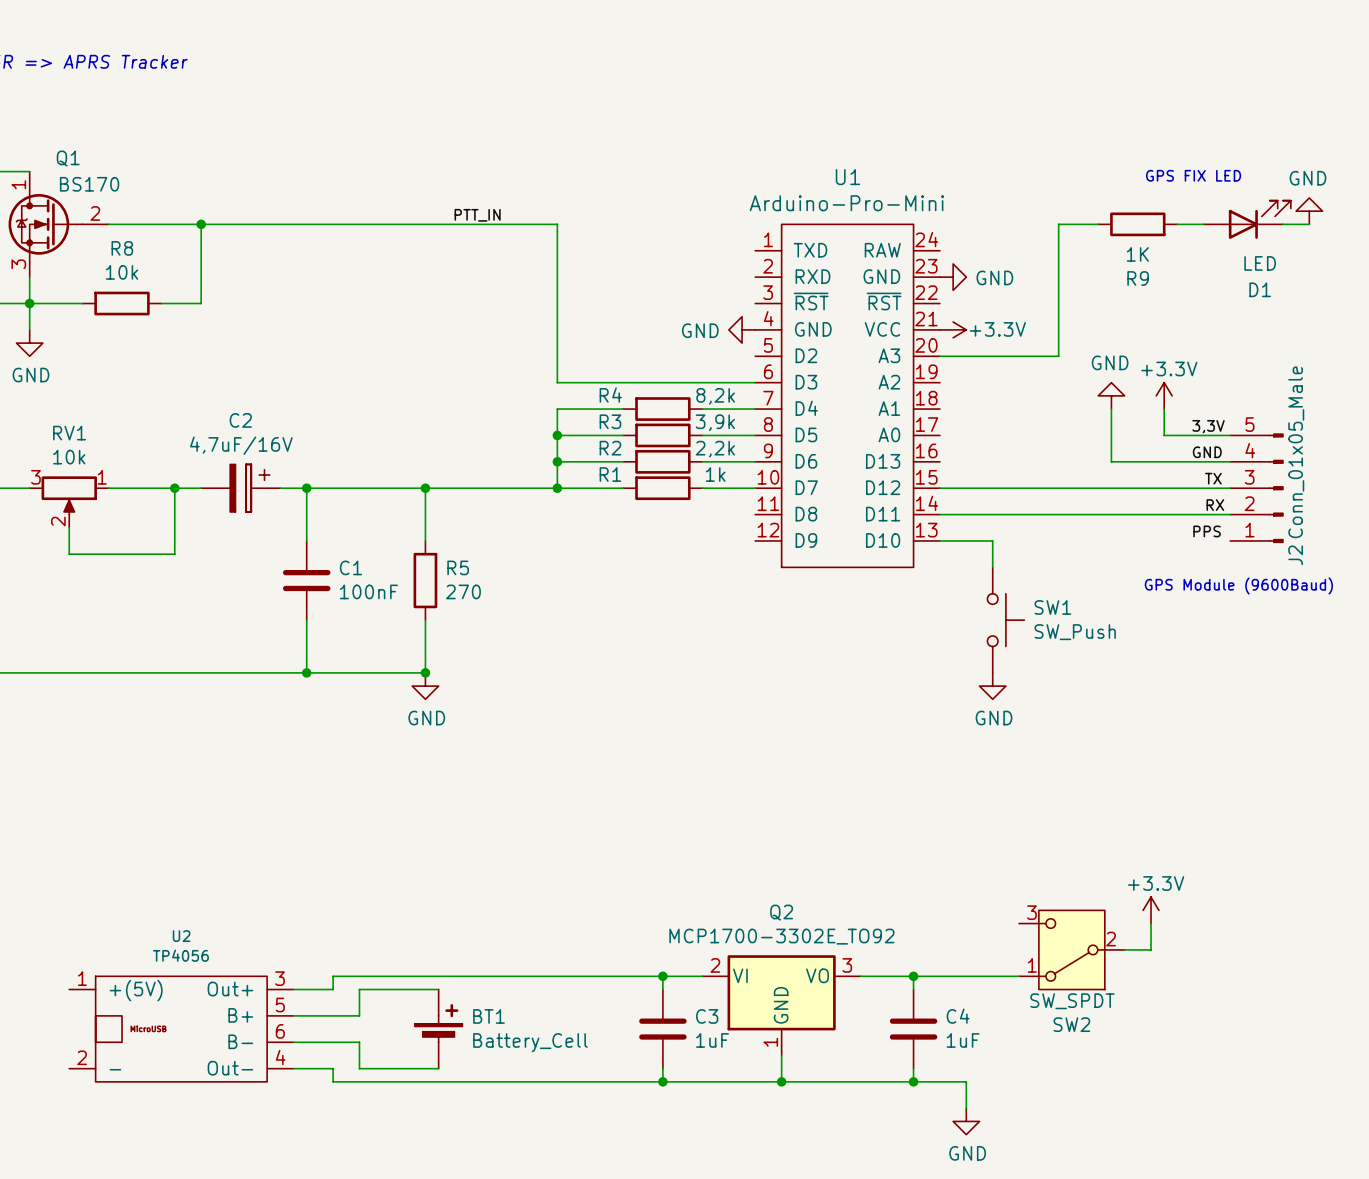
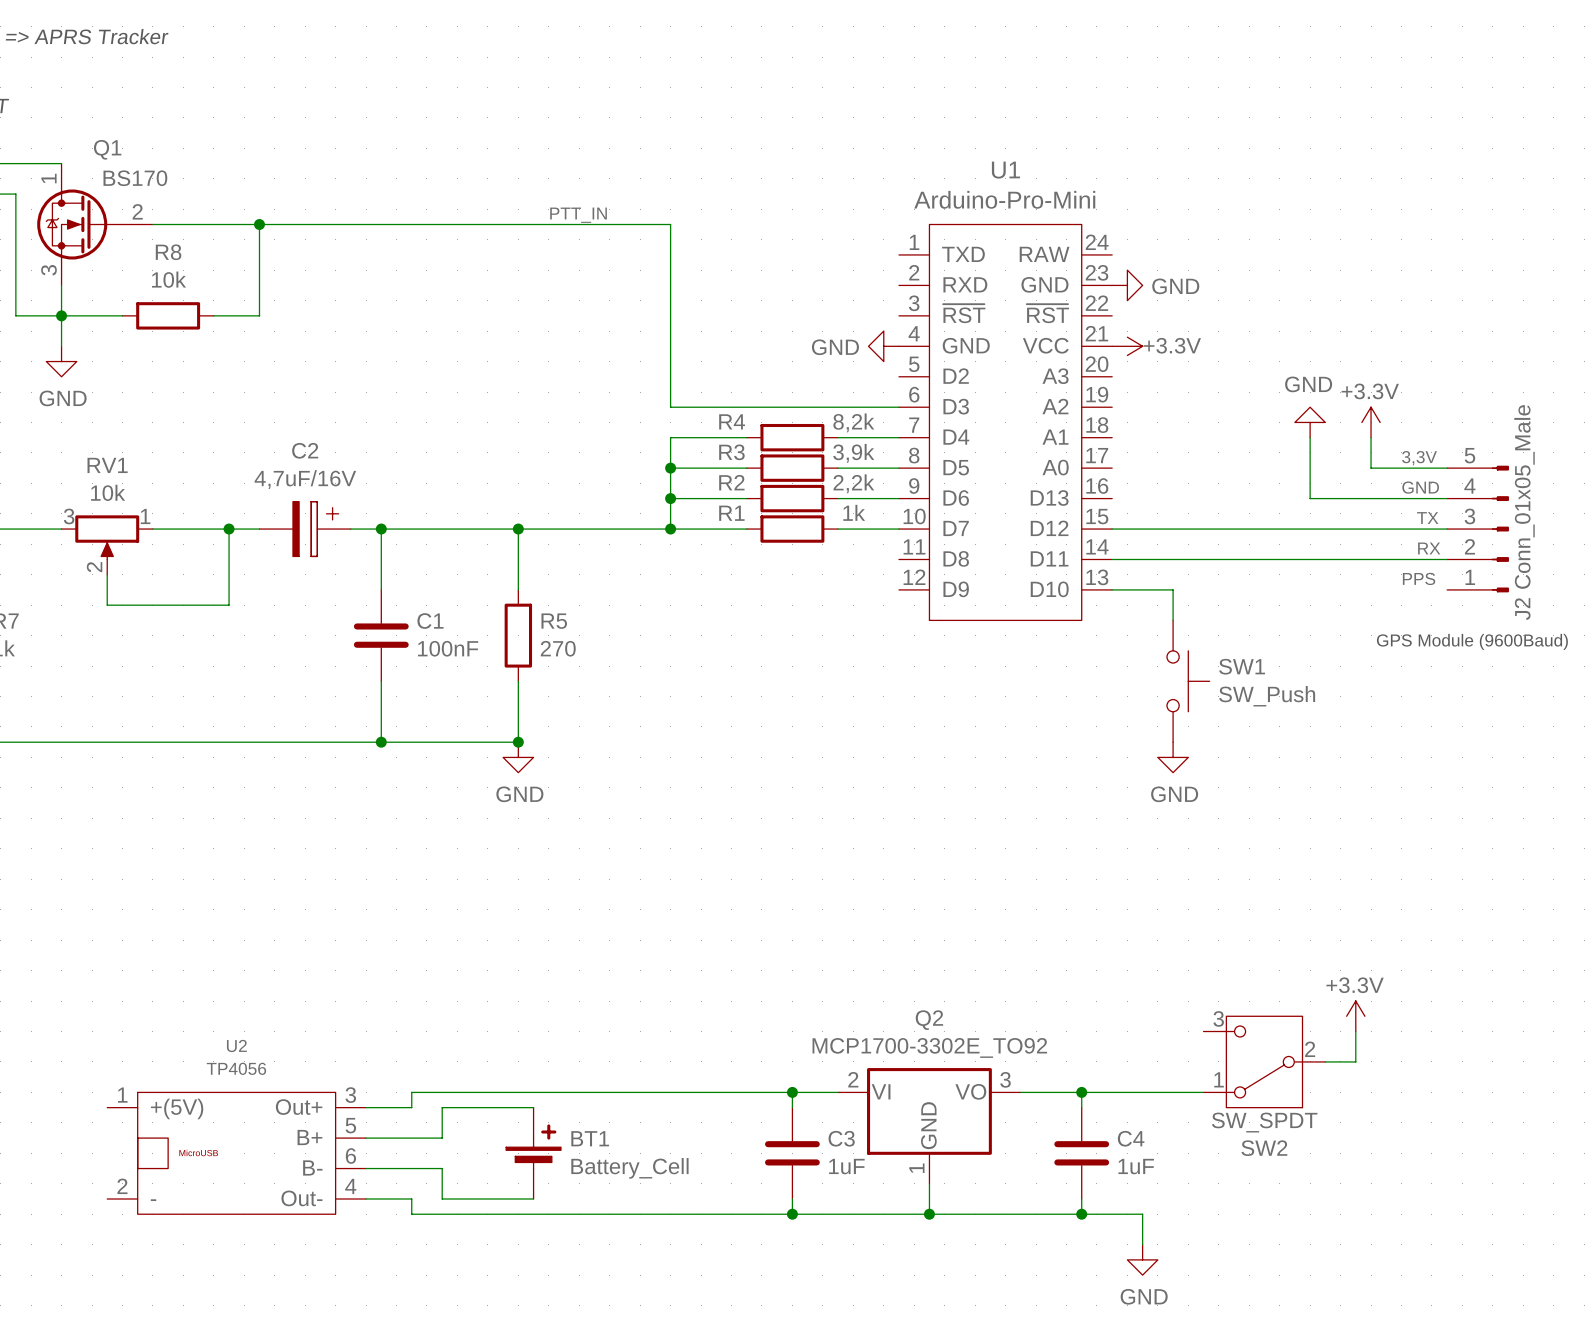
text: GPS FIX LED (1193, 175) -> none
power symbol: GND (1309, 211) -> none
D1: LED (1247, 219) -> none
wire: (1098, 224) (1058, 224) (1058, 356) (939, 356) -> none
R9: 1K (1137, 224) -> none
wire: (1177, 224) (1203, 224) -> none
wire: (1282, 224) (1309, 224) -> none

